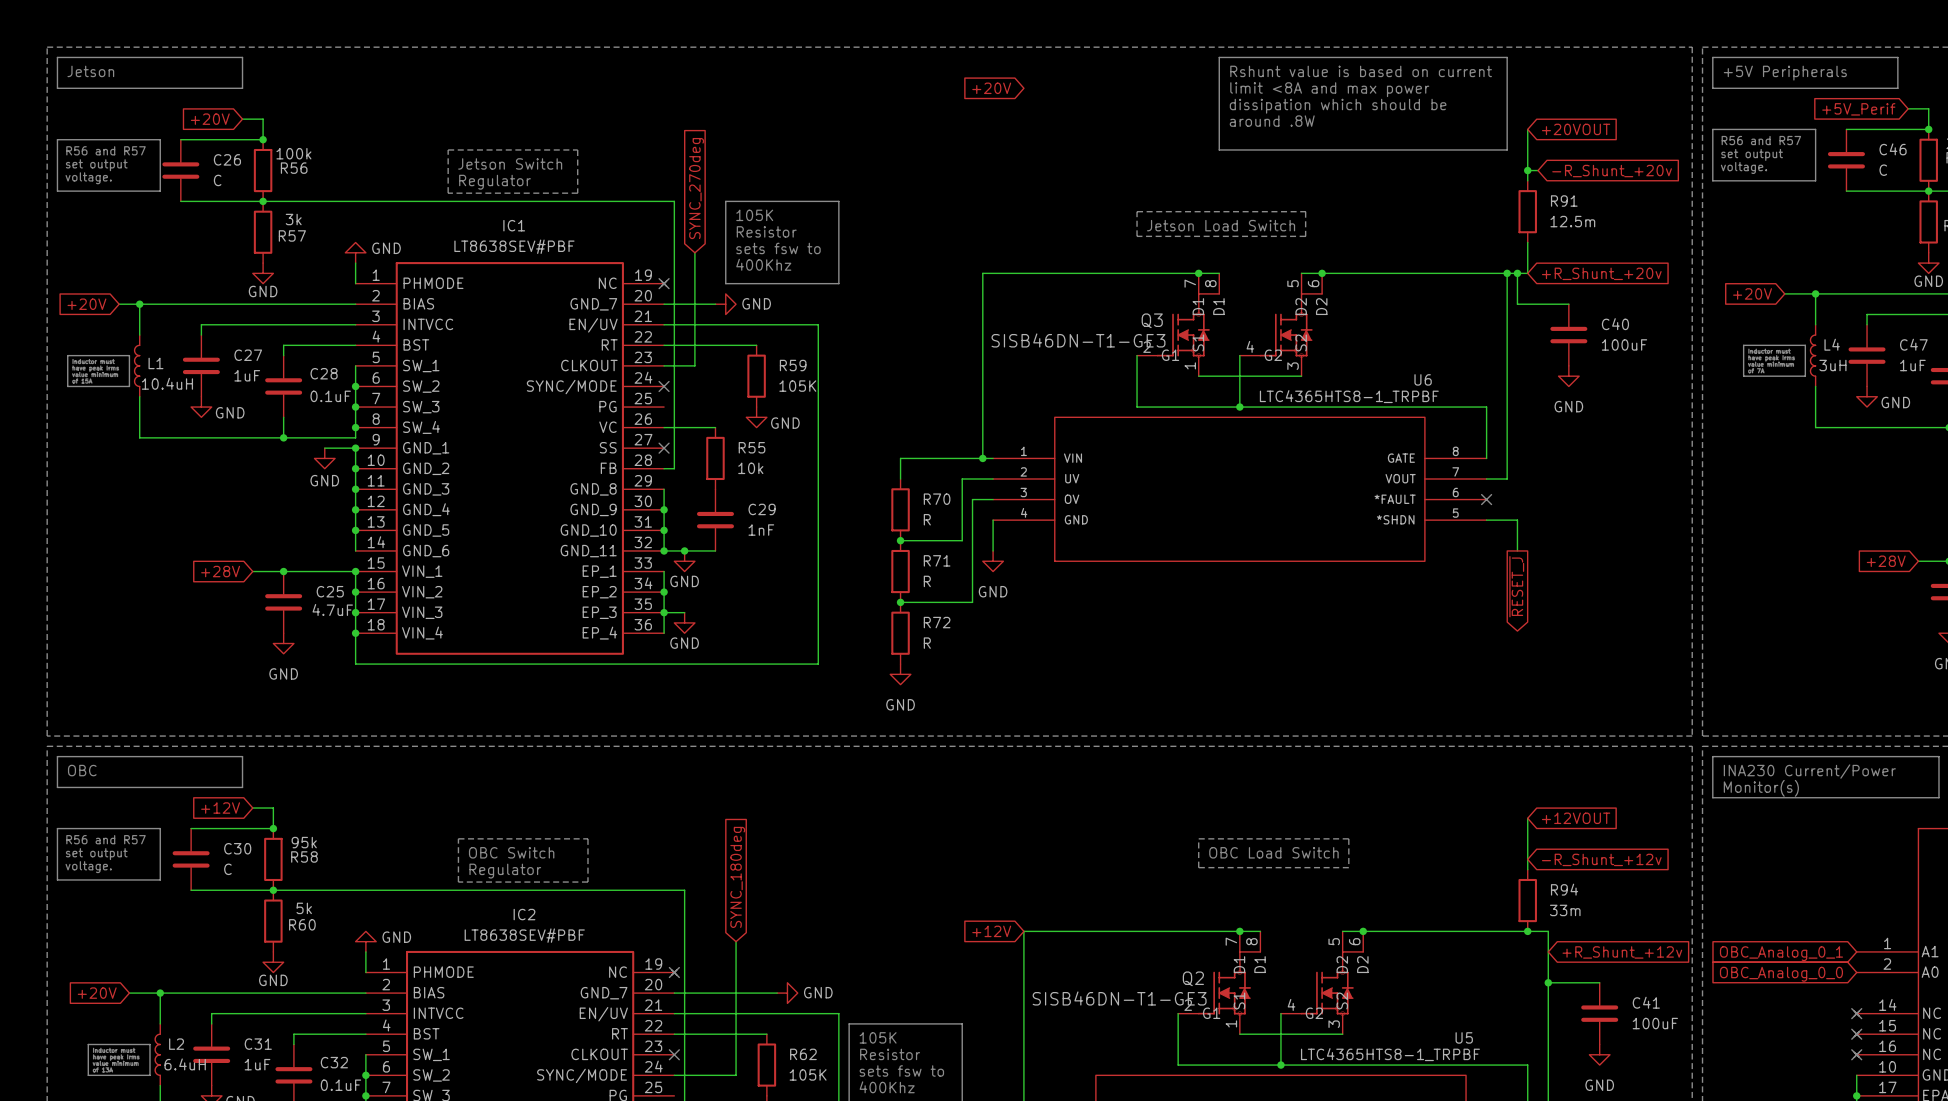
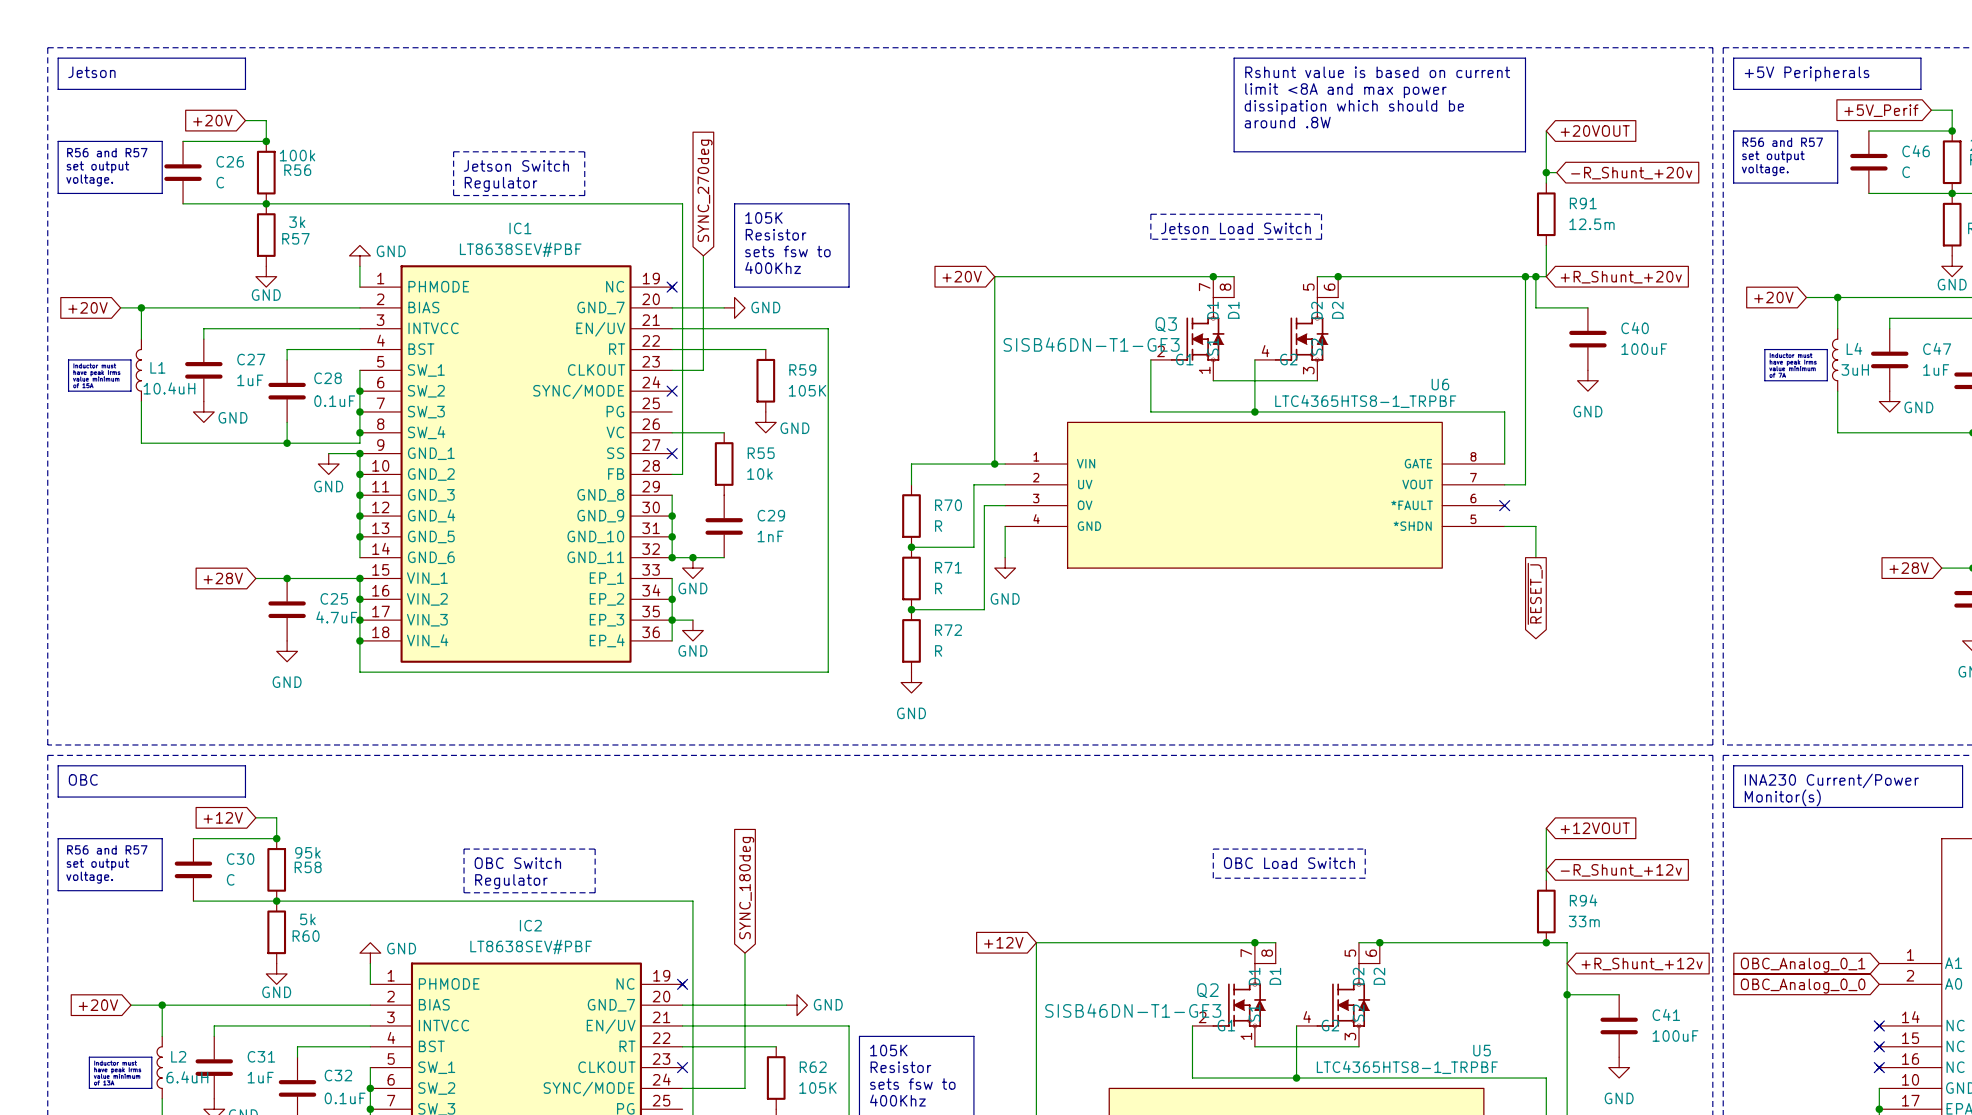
global label position: +20V (991, 88) -> +20V (962, 276)

